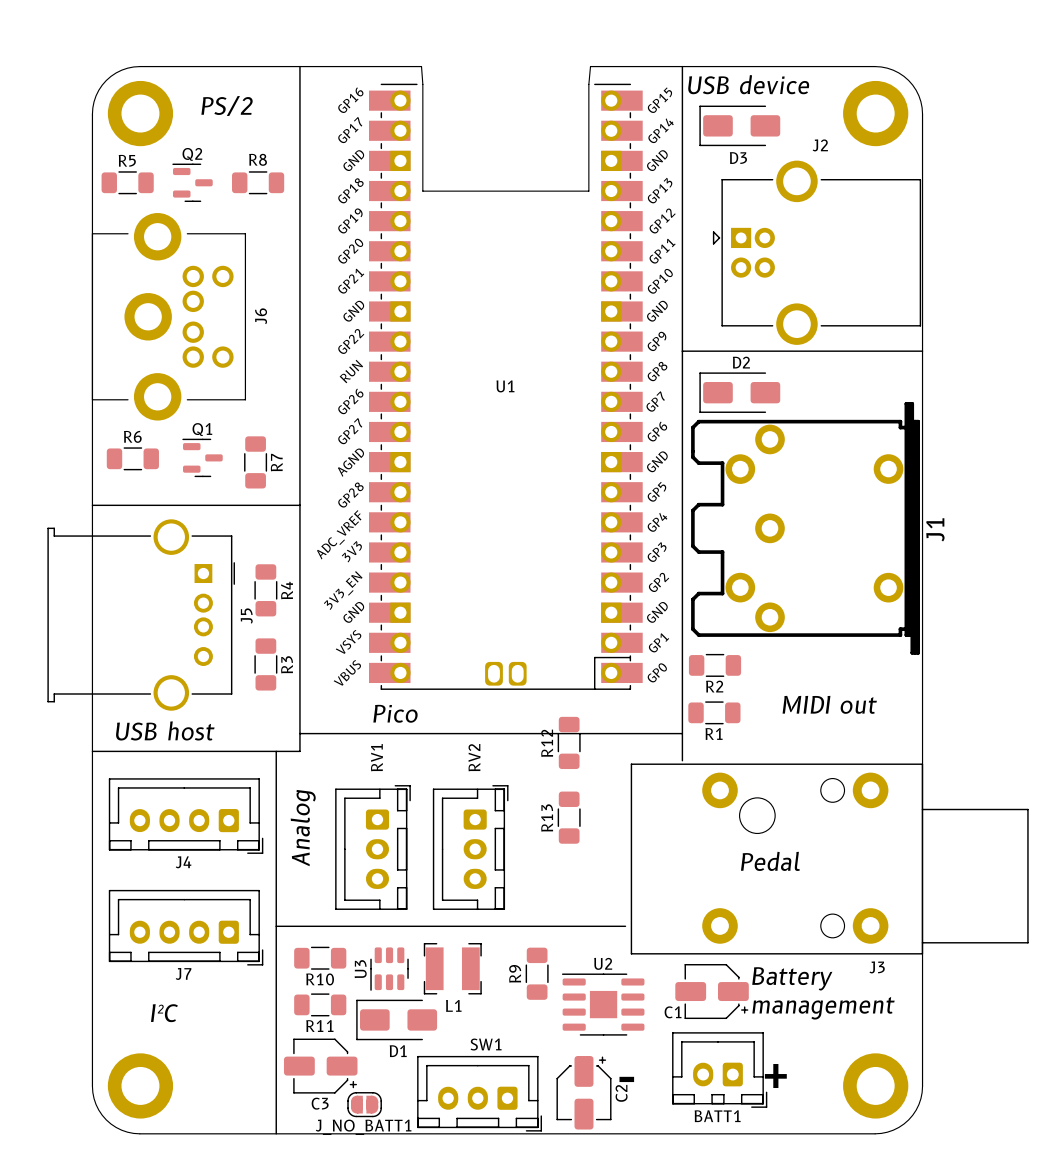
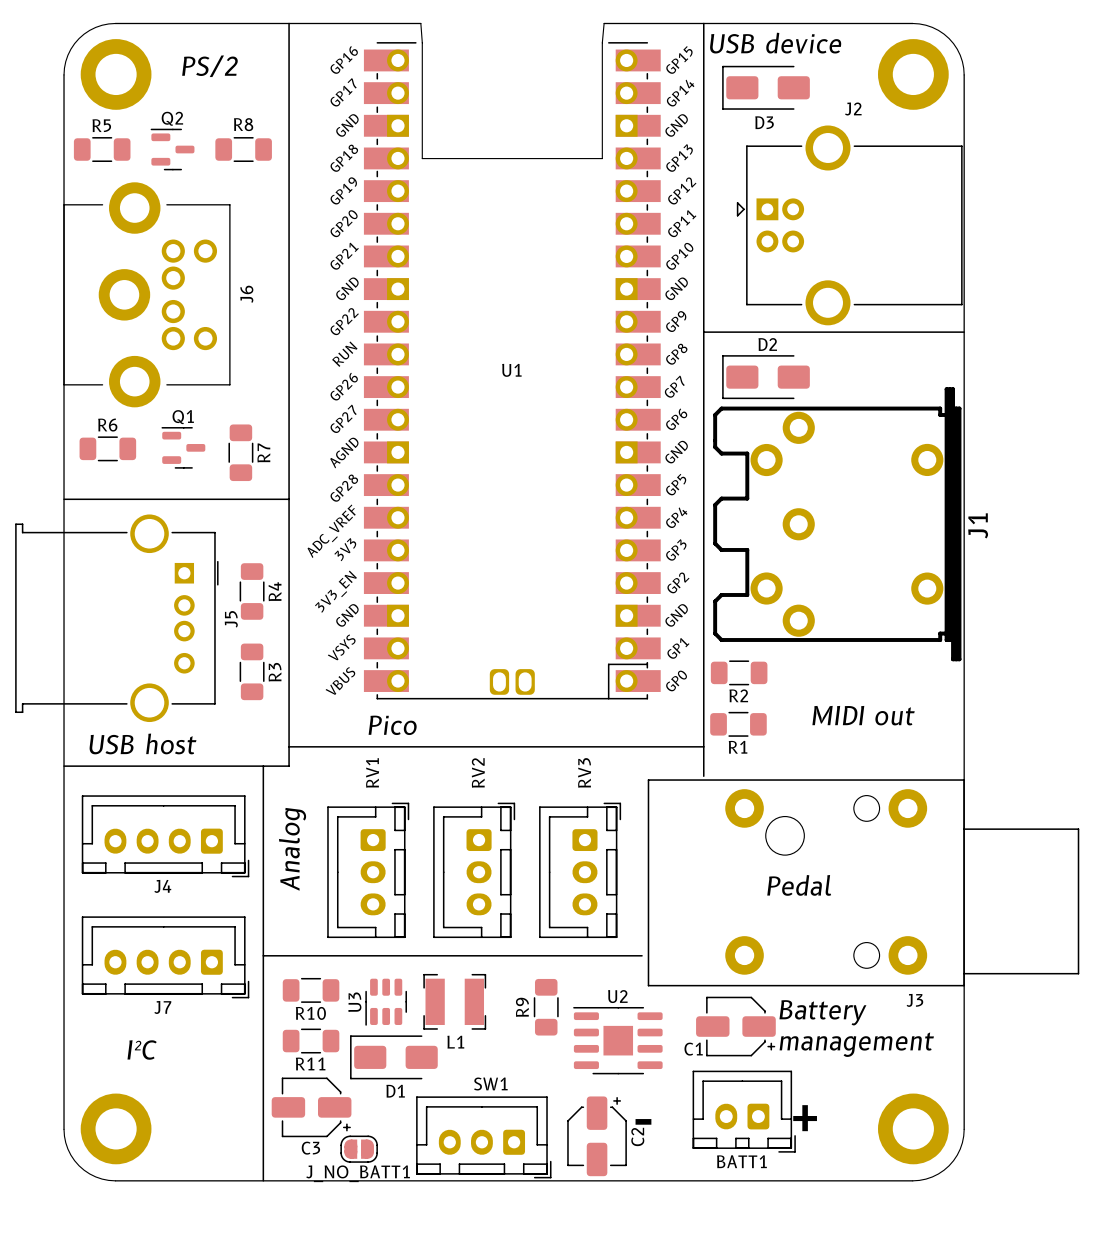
R12: (569, 742) -> none
R13: (569, 817) -> none
RV3: none -> (580, 870)

